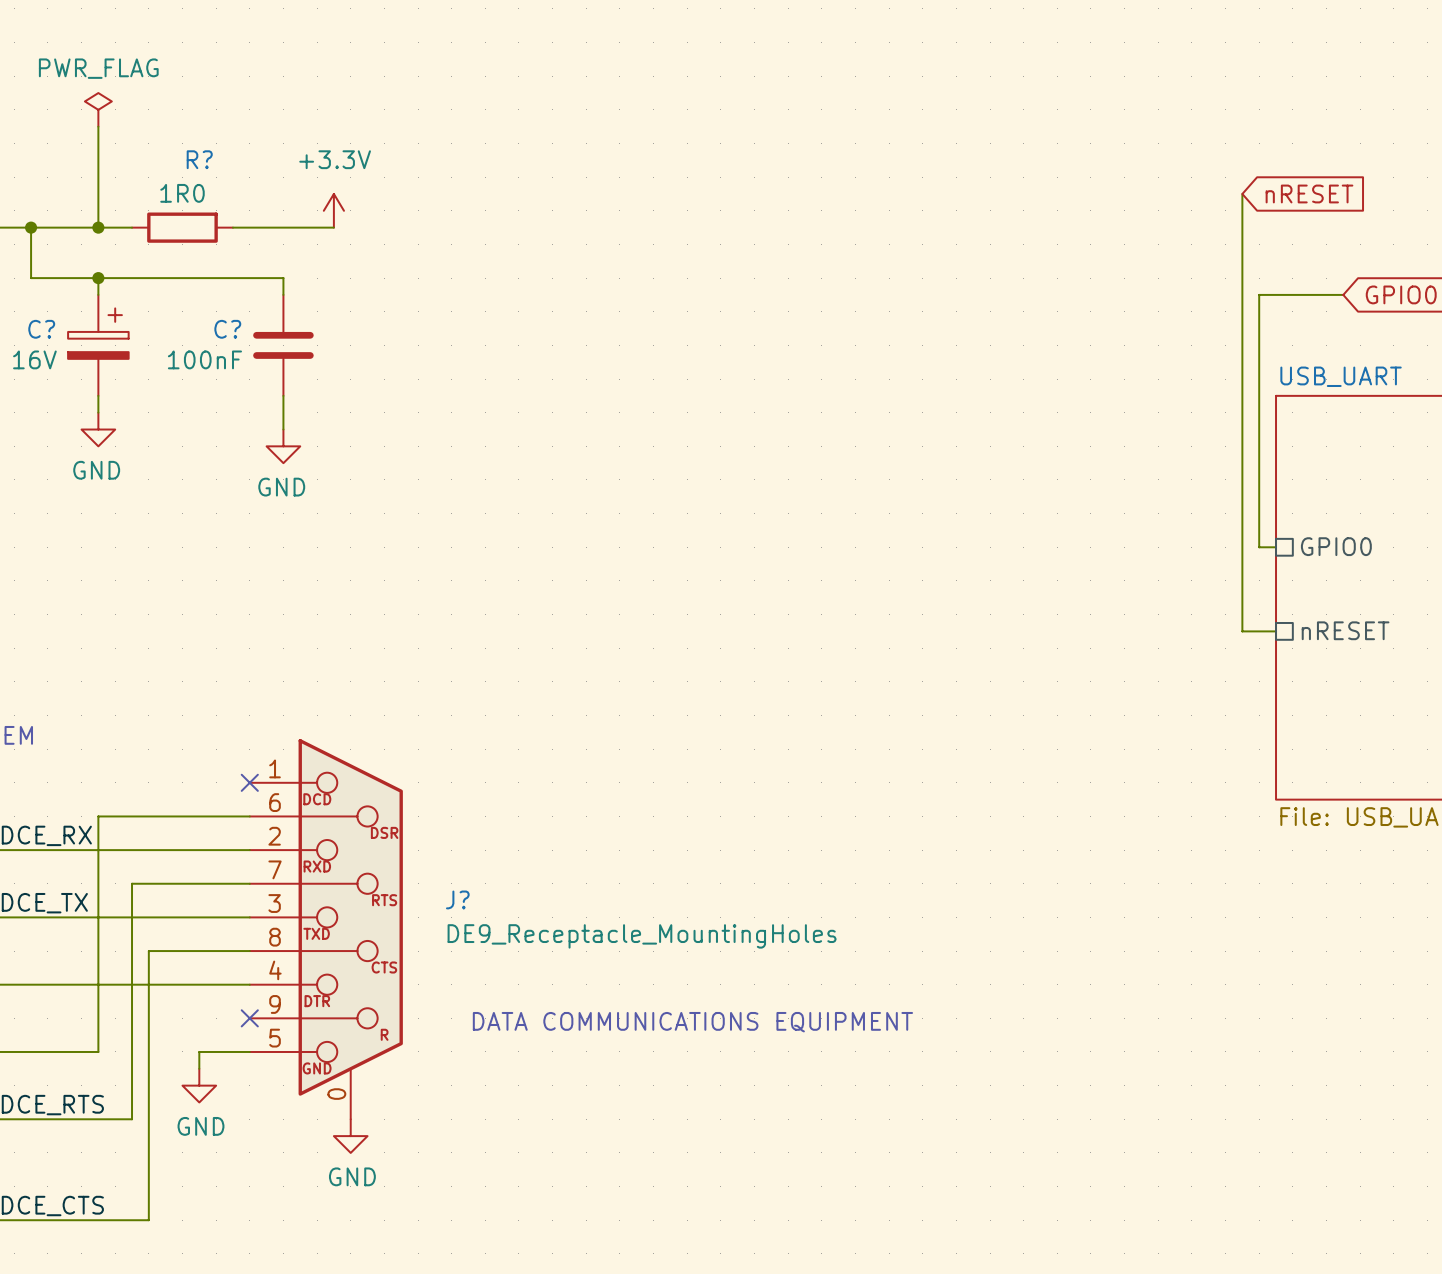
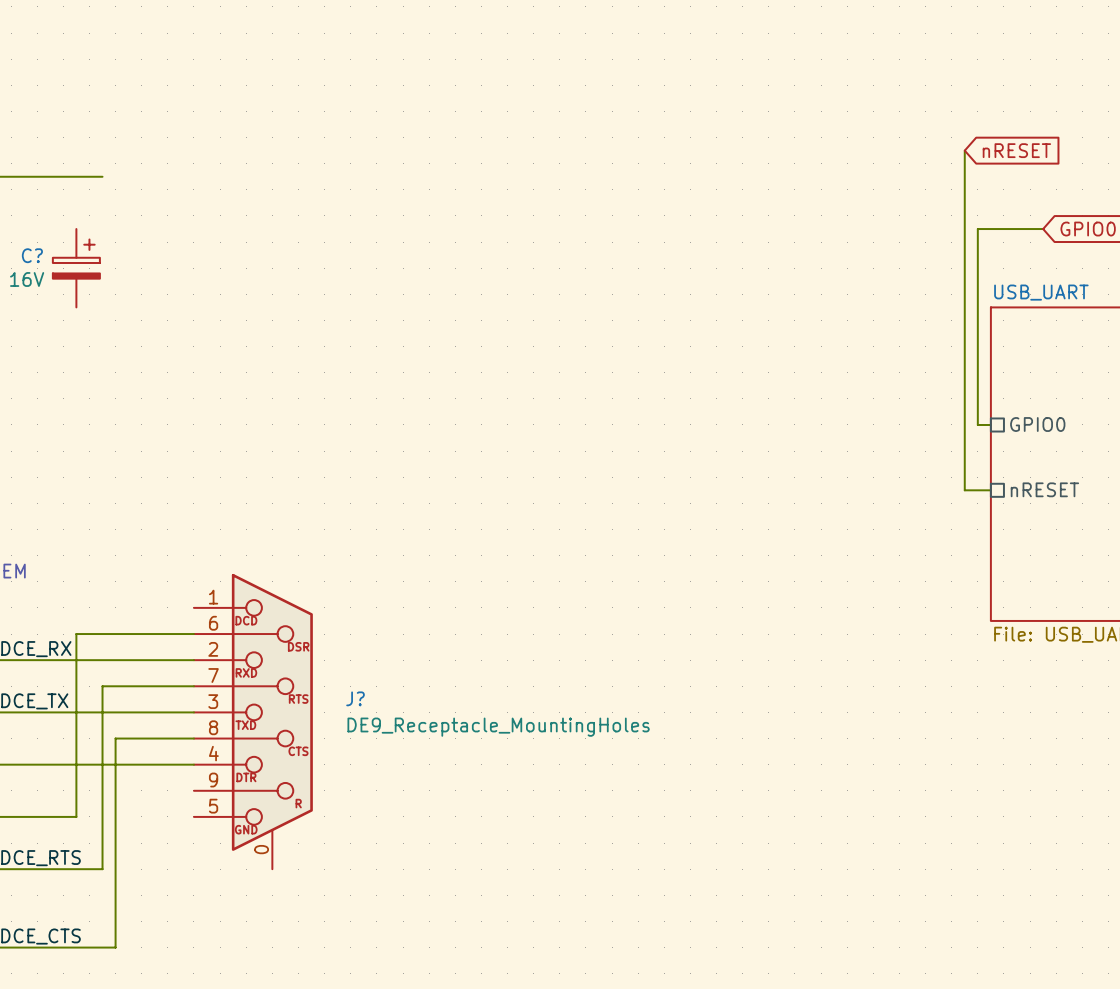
power symbol: PWR_FLAG (98, 109) -> none
wire: (98, 126) (98, 227) -> none
power symbol: +3.3V (333, 210) -> none
wire: (31, 227) (31, 278) (283, 278) (283, 294) -> none
junction: (31, 227) -> none
junction: (98, 227) -> none
R?: 1R0 (182, 227) -> none
wire: (232, 227) (333, 227) -> none
wire: (98, 278) (98, 294) -> none
junction: (98, 278) -> none
C?: 100nF (283, 345) -> none
wire: (98, 395) (98, 412) -> none
wire: (283, 395) (283, 429) -> none
power symbol: GND (98, 429) -> none
power symbol: GND (283, 446) -> none
no-connect mark: (249, 782) -> none
no-connect mark: (249, 1018) -> none
text: DATA COMMUNICATIONS EQUIPMENT (692, 1022) -> none
wire: (249, 1051) (199, 1051) (199, 1068) -> none
power symbol: GND (199, 1085) -> none
power symbol: GND (350, 1136) -> none

